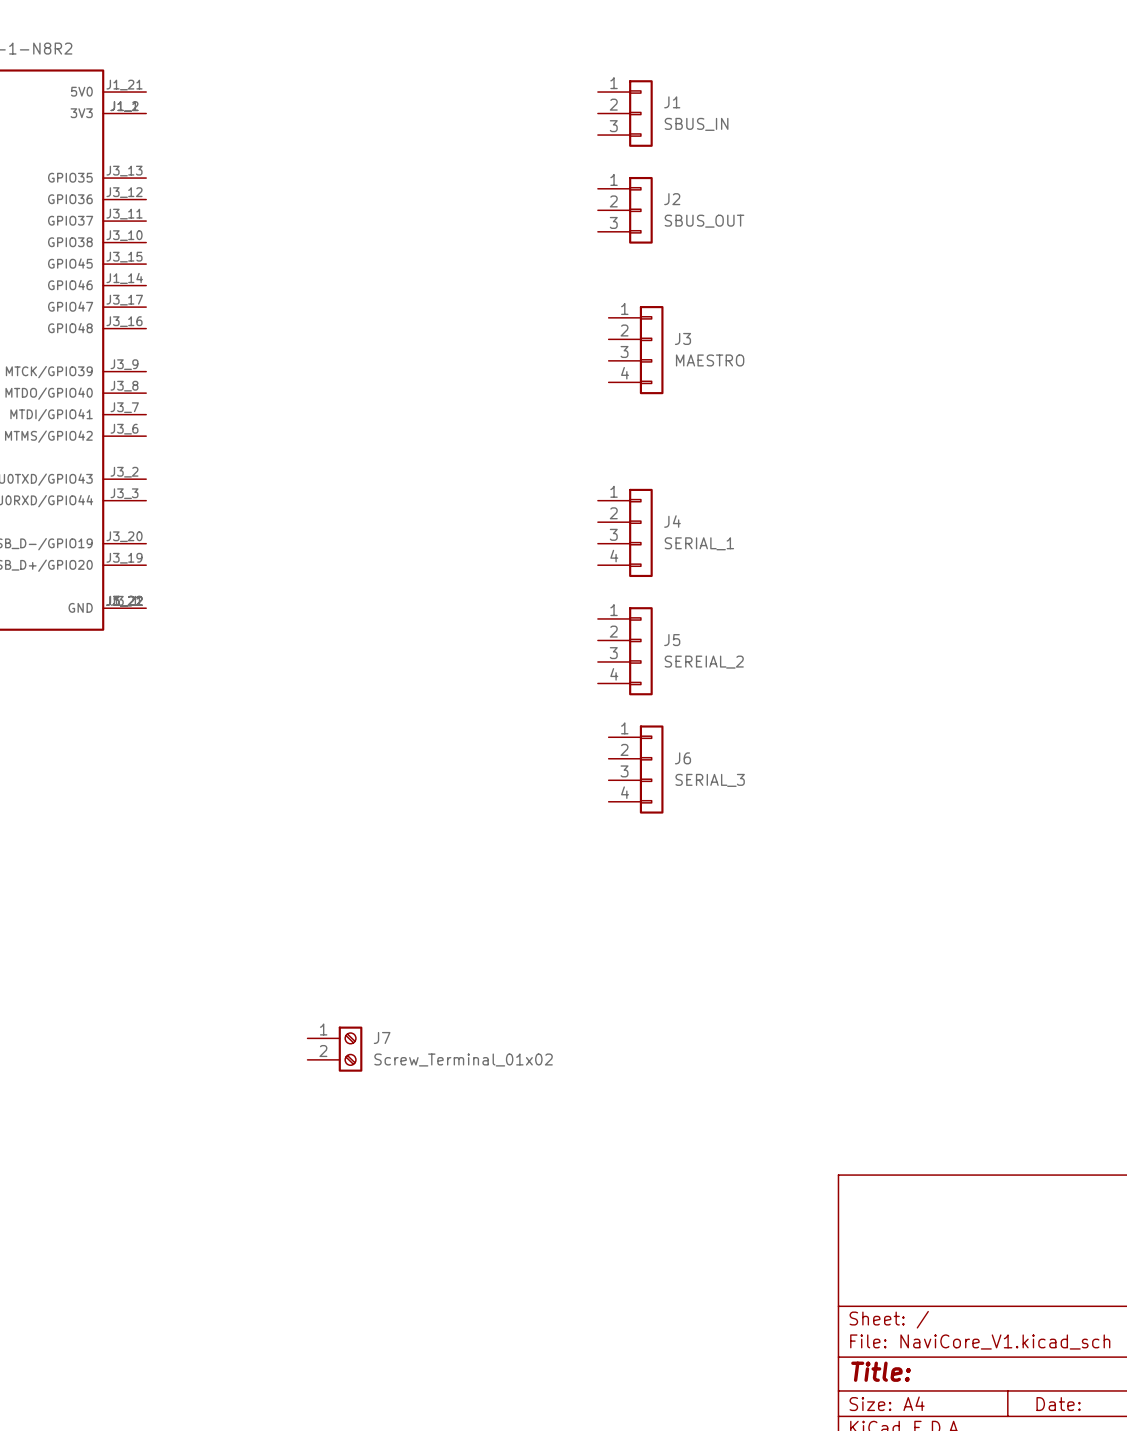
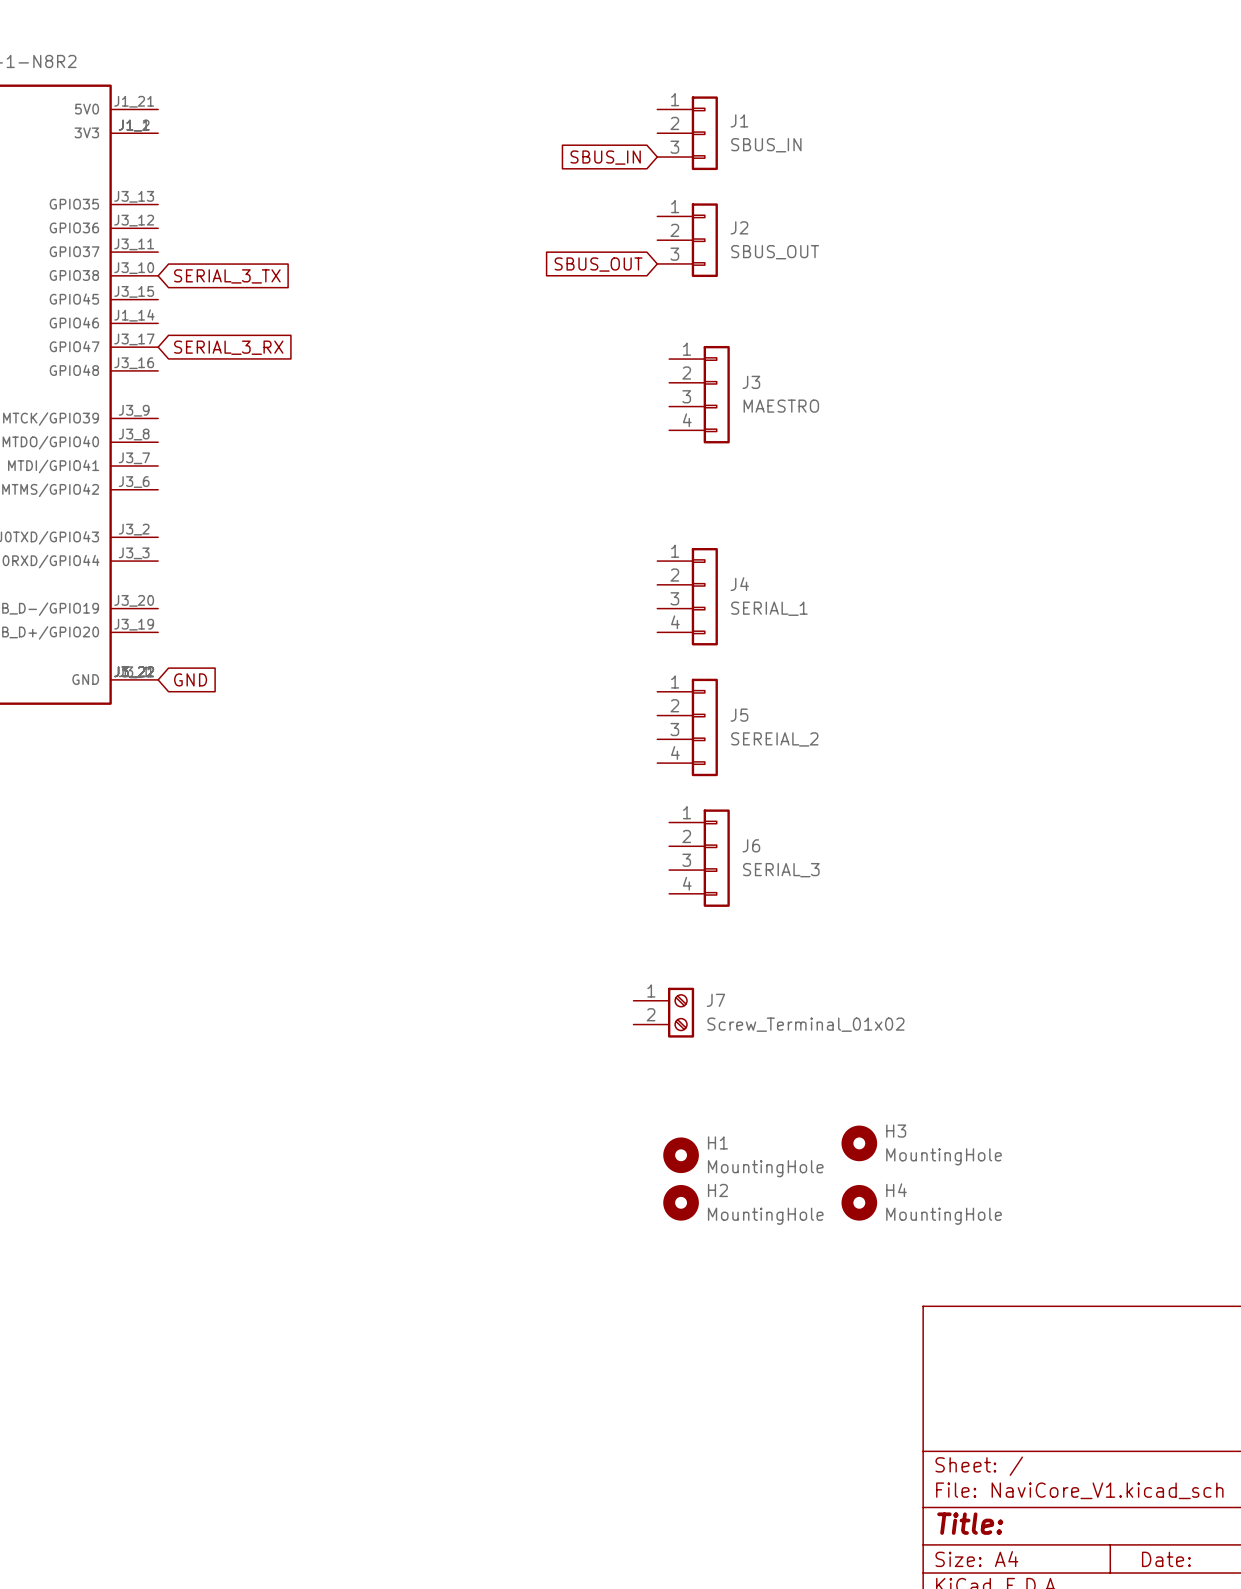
global label: none -> SBUS_IN (605, 157)
global label: none -> SBUS_OUT (598, 264)
global label: none -> SERIAL_3_TX (227, 276)
global label: none -> SERIAL_3_RX (228, 347)
global label: none -> GND (190, 679)
H3: none -> MountingHole (859, 1143)
H1: none -> MountingHole (681, 1155)
J7 position: (334, 1049) -> (663, 1012)
H2: none -> MountingHole (681, 1202)
H4: none -> MountingHole (859, 1202)

